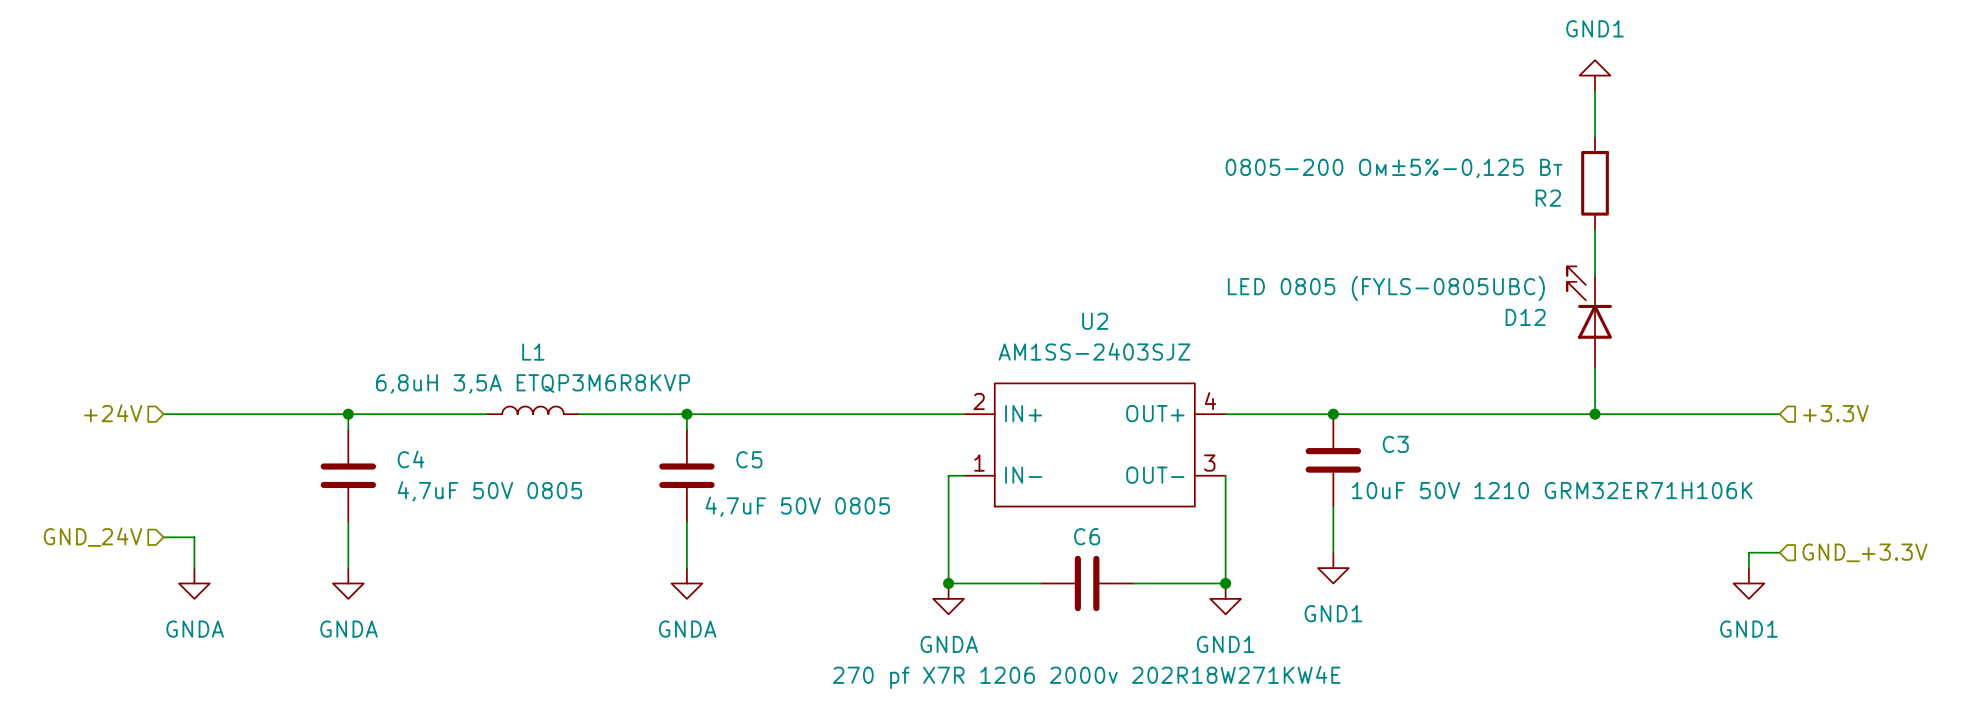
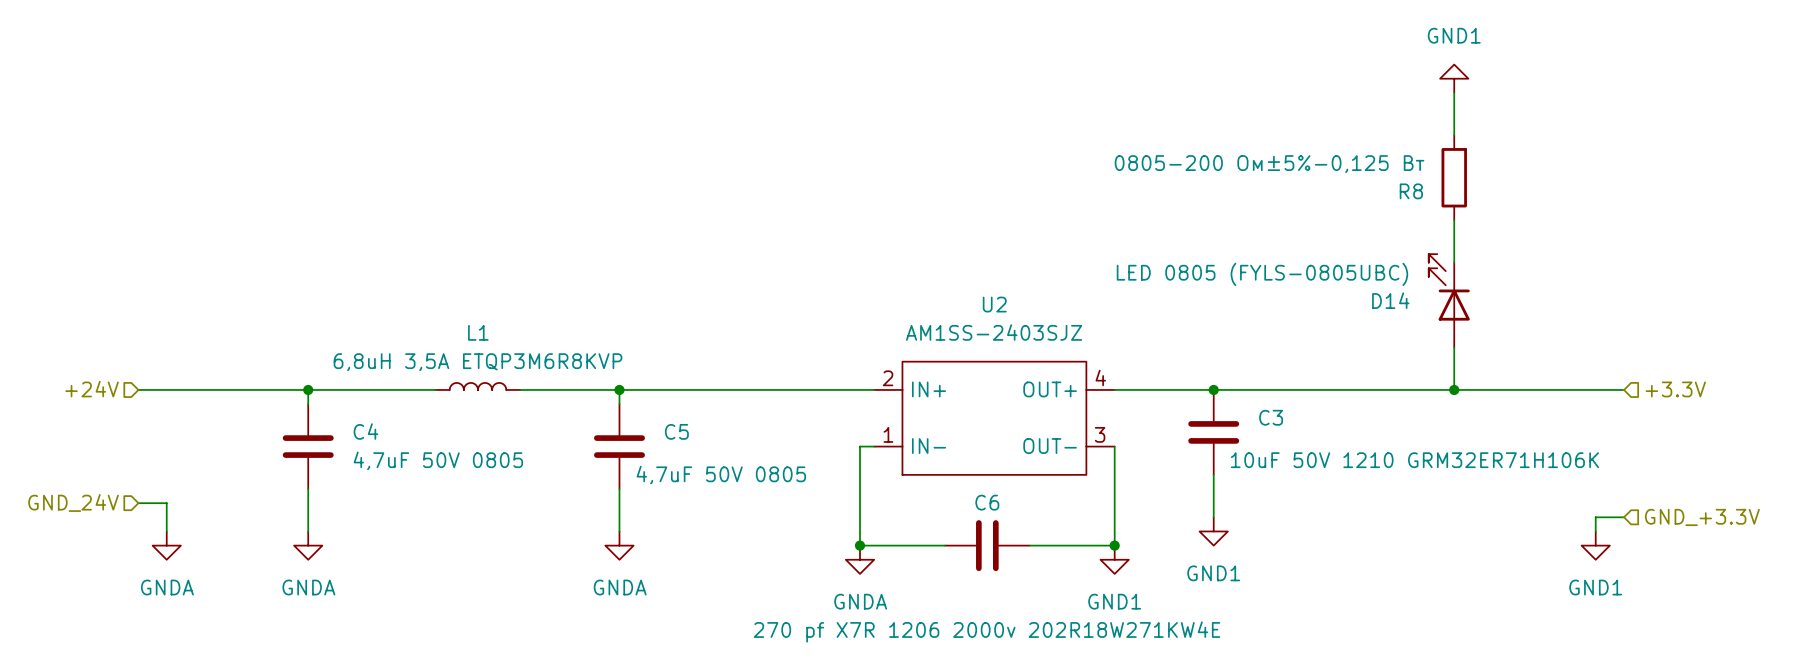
R2 name: R2 (1548, 198) -> R8 (1411, 191)
D12 name: D12 (1525, 317) -> D14 (1390, 300)

